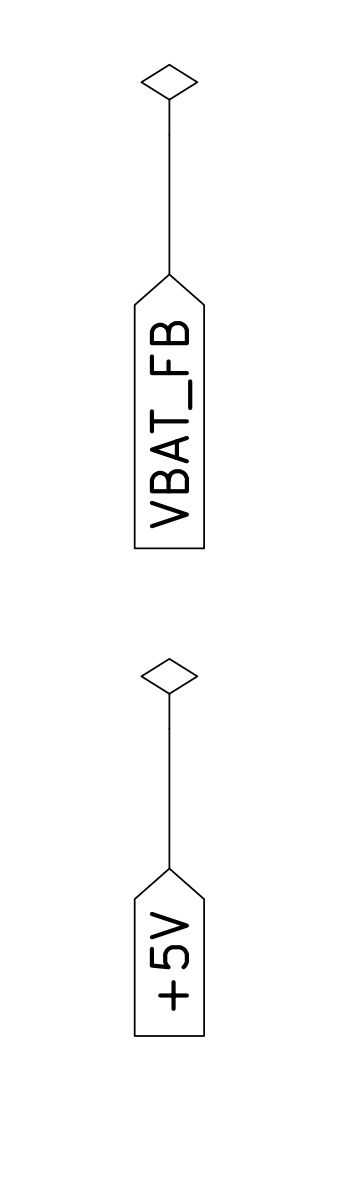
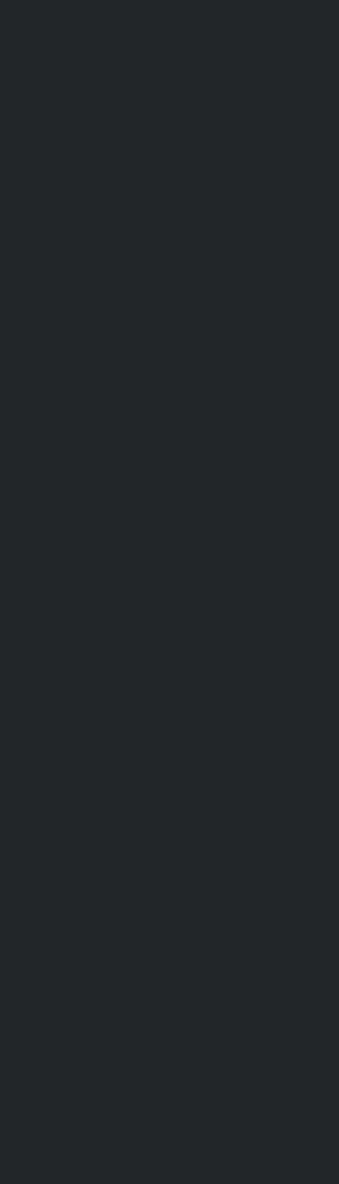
power symbol: (169, 99) -> none
wire: (169, 134) (169, 274) -> none
global label: VBAT_FB (171, 424) -> none
power symbol: (169, 693) -> none
wire: (169, 728) (169, 868) -> none
global label: +5V (169, 961) -> none

